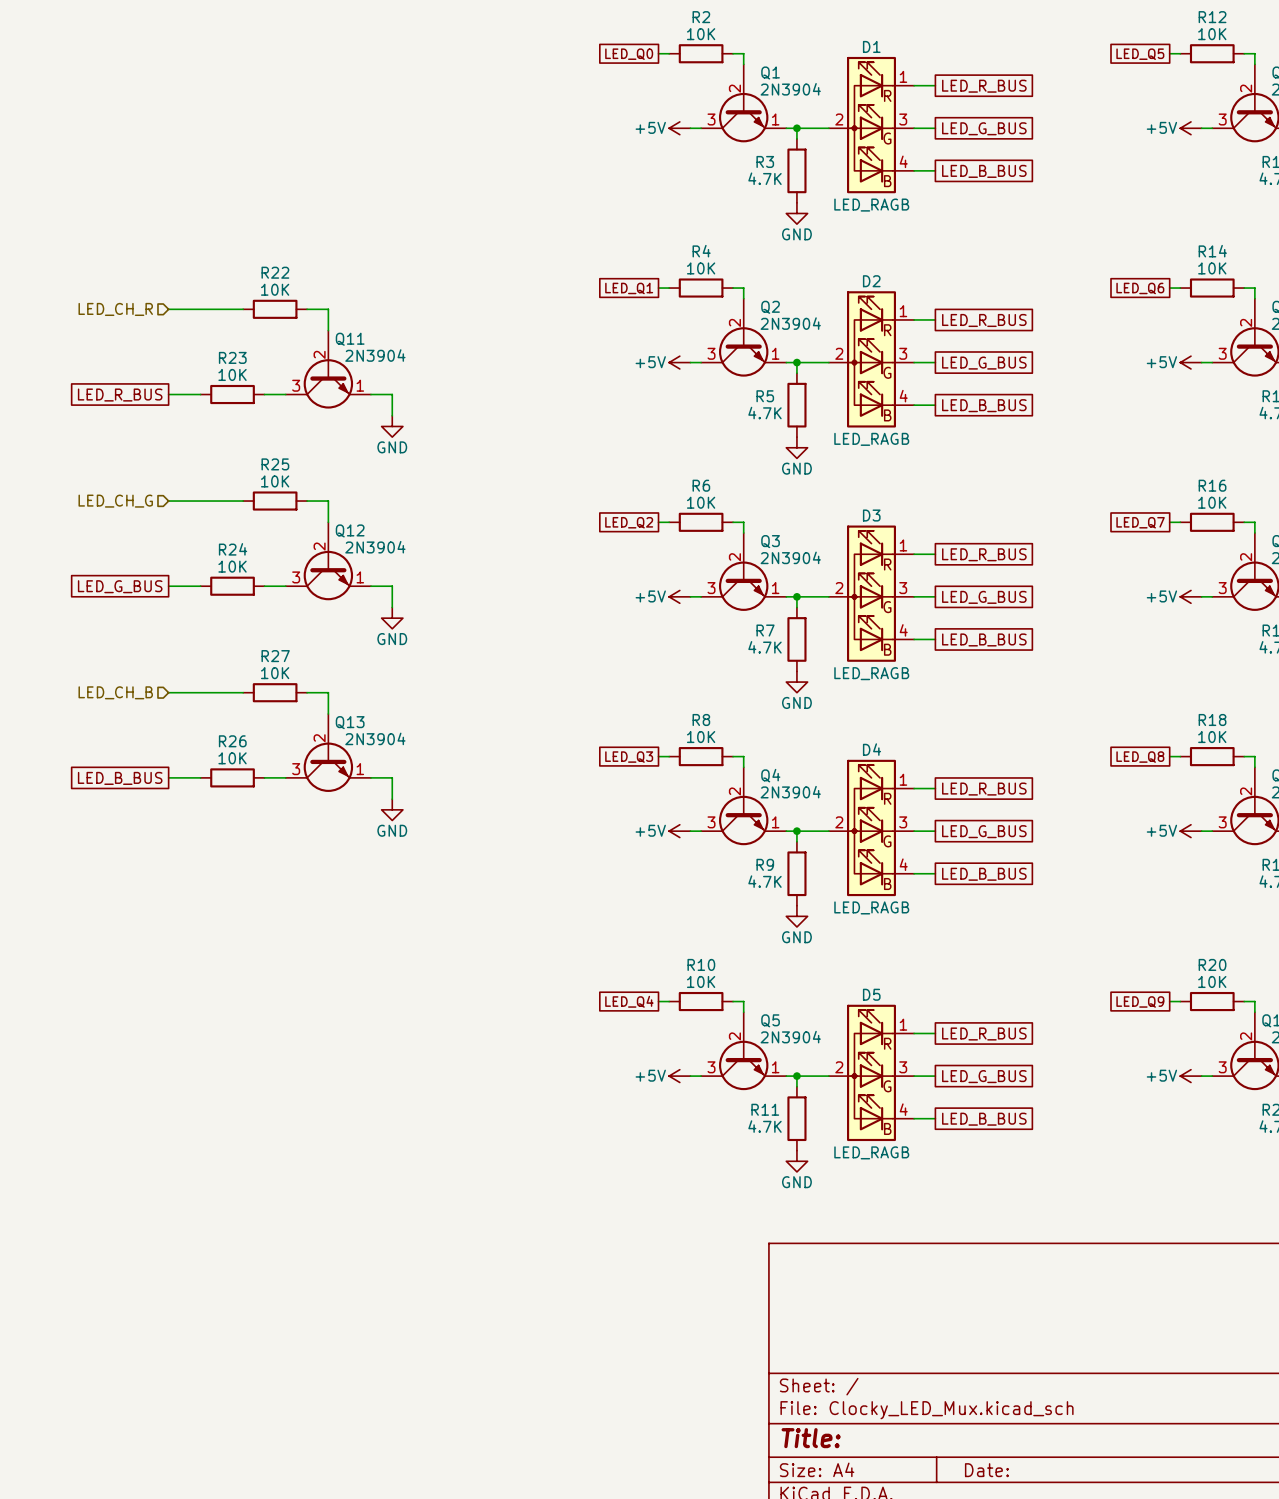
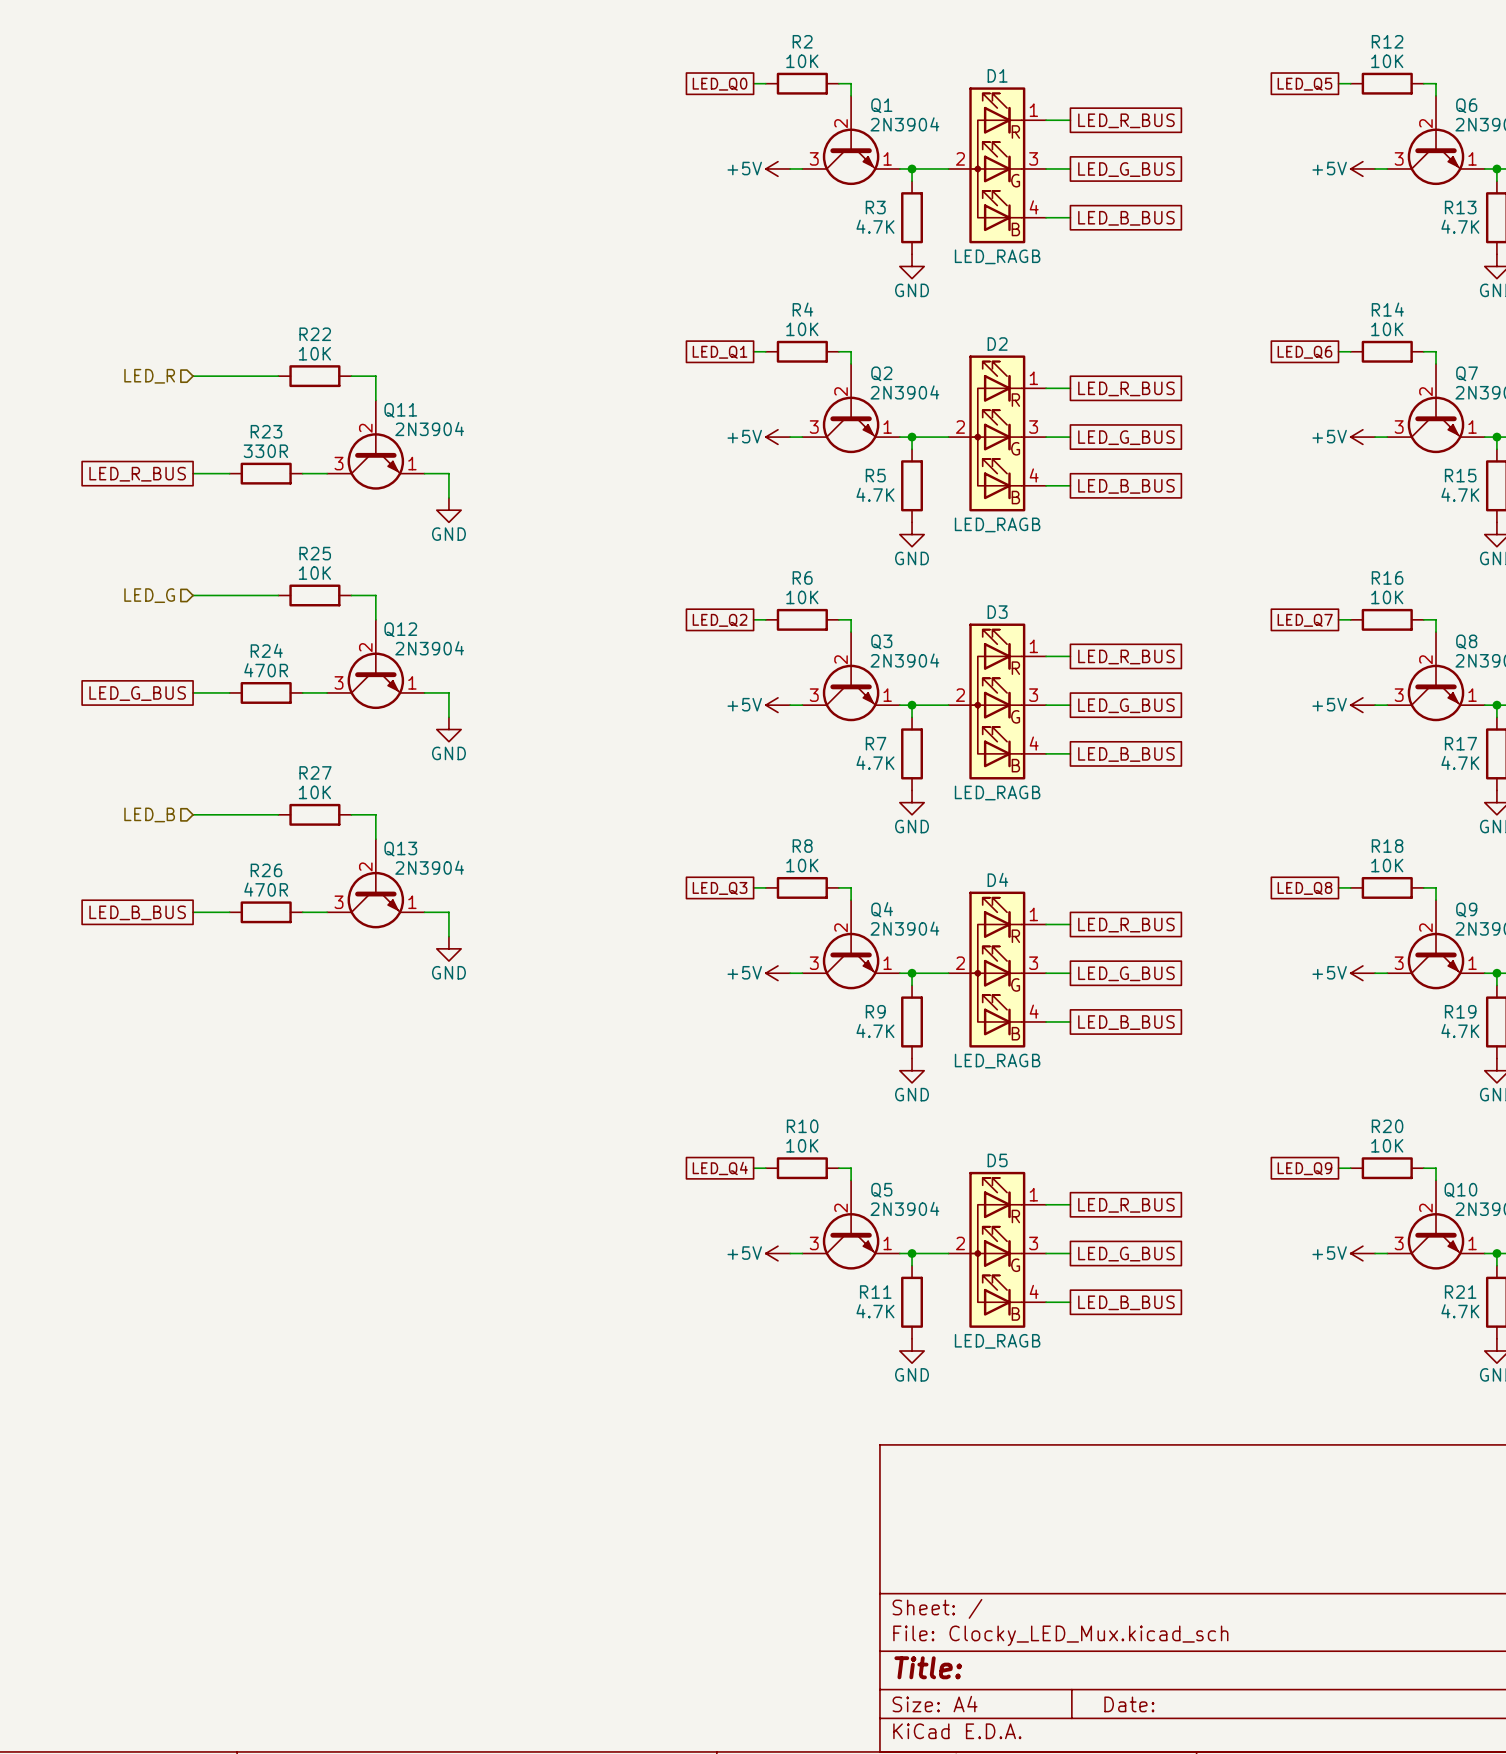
hierarchical label: LED_CH_R (115, 309) -> LED_R (149, 376)
R23 value: 10K (232, 374) -> 330R (265, 451)
hierarchical label: LED_CH_G (115, 501) -> LED_G (149, 595)
R24 value: 10K (232, 566) -> 470R (266, 670)
hierarchical label: LED_CH_B (115, 692) -> LED_B (149, 814)
R26 value: 10K (232, 758) -> 470R (266, 889)

